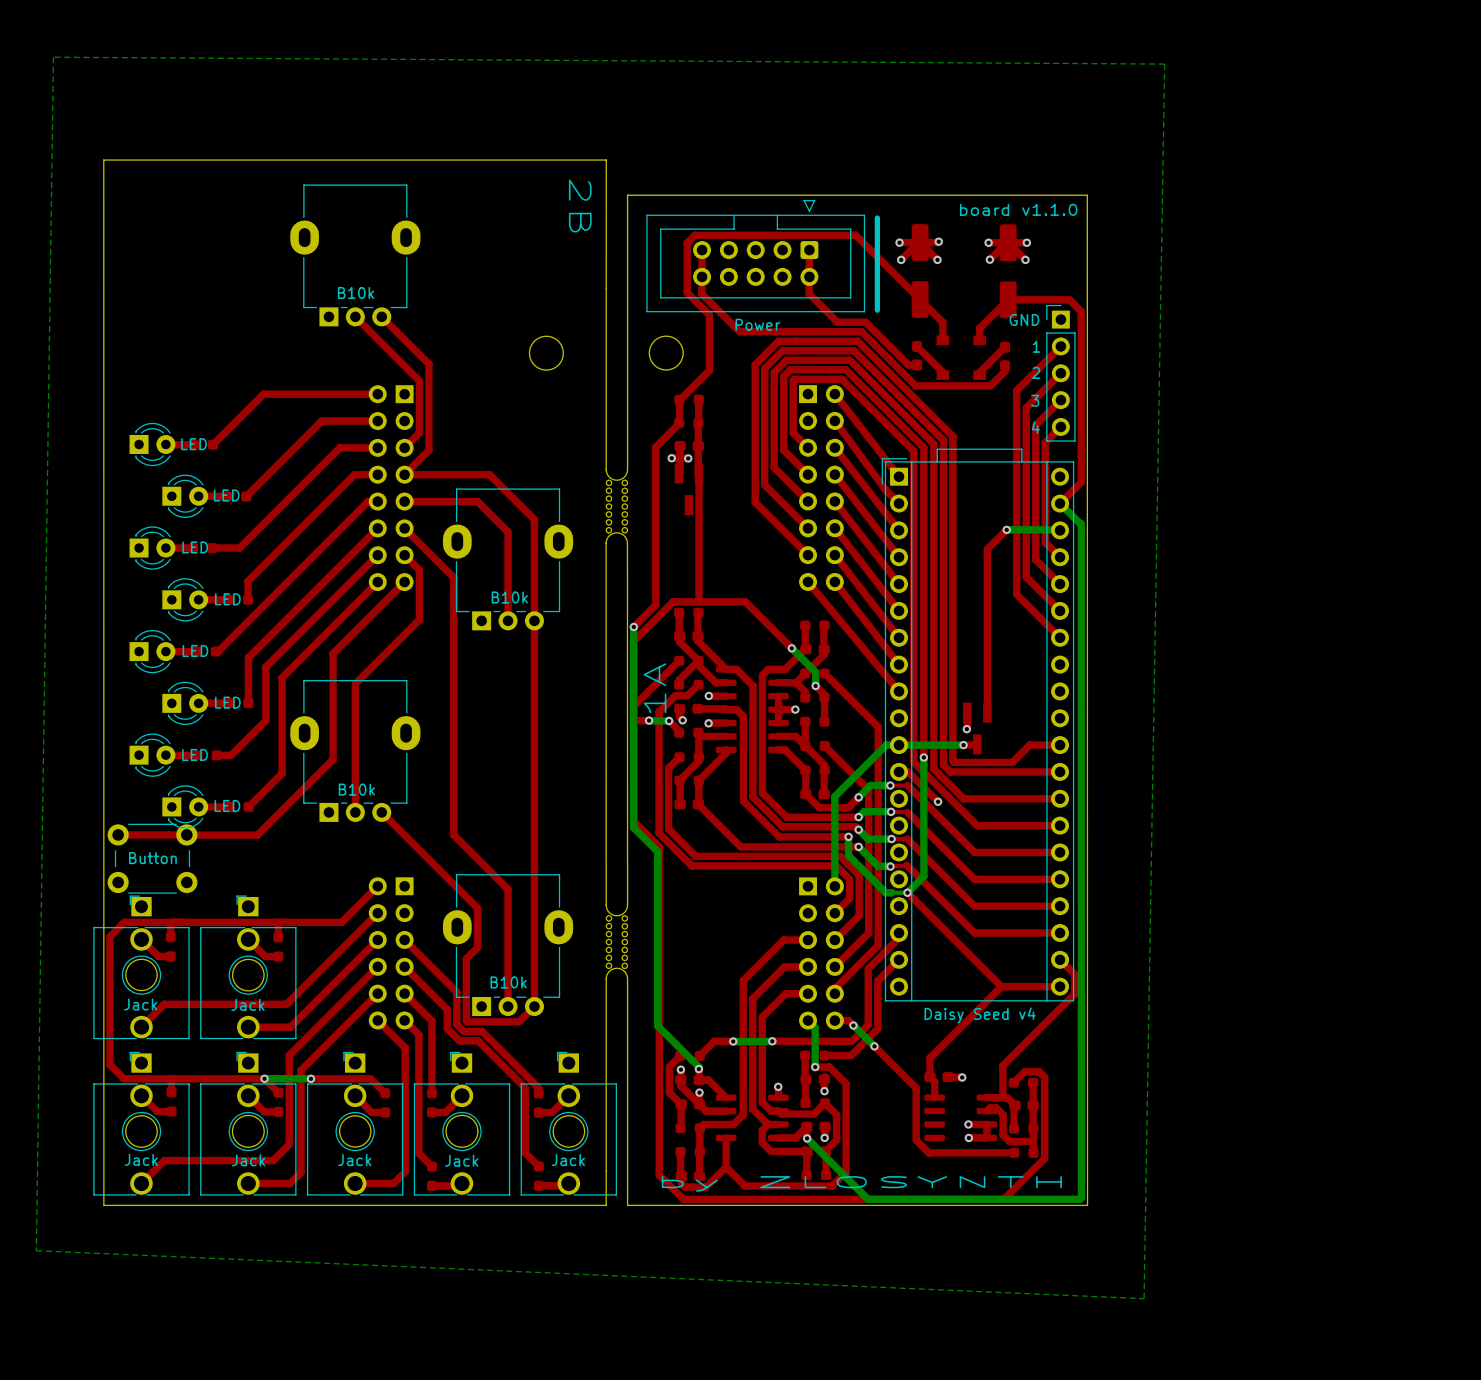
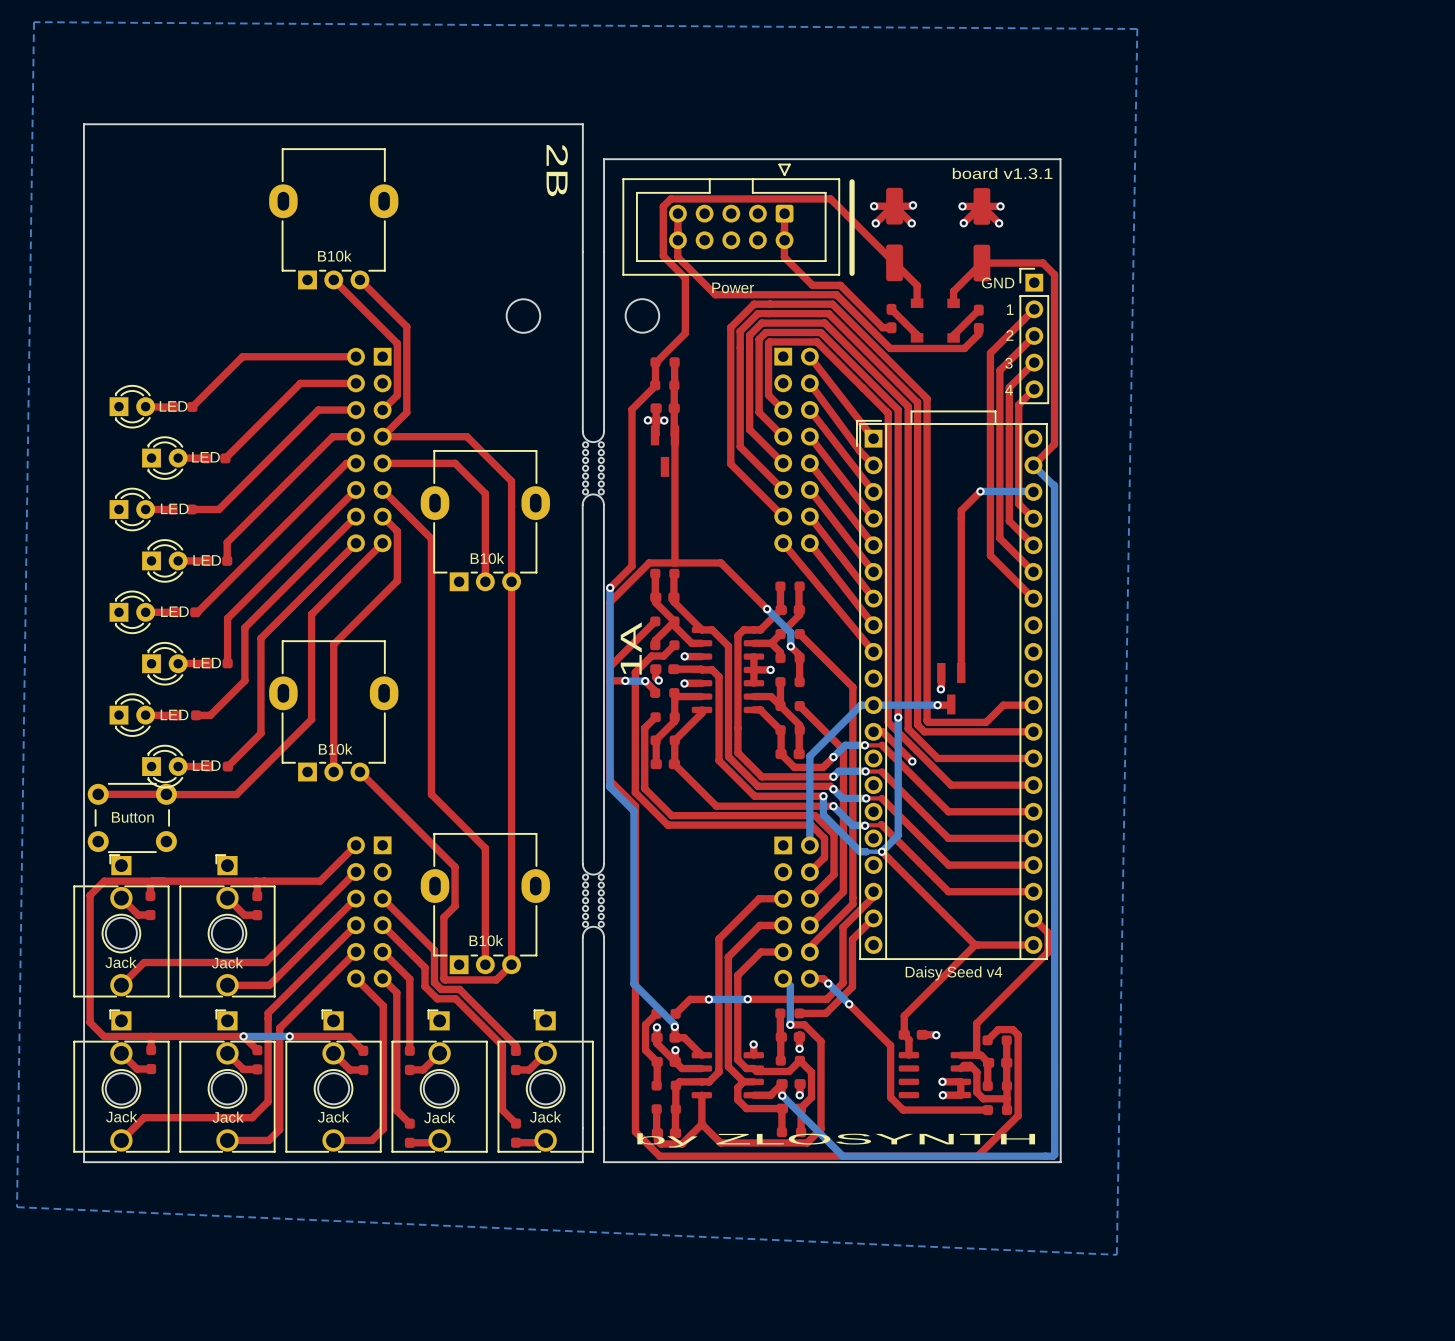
text: board v1.1.0 (1018, 209) -> board v1.3.1 (1002, 173)

